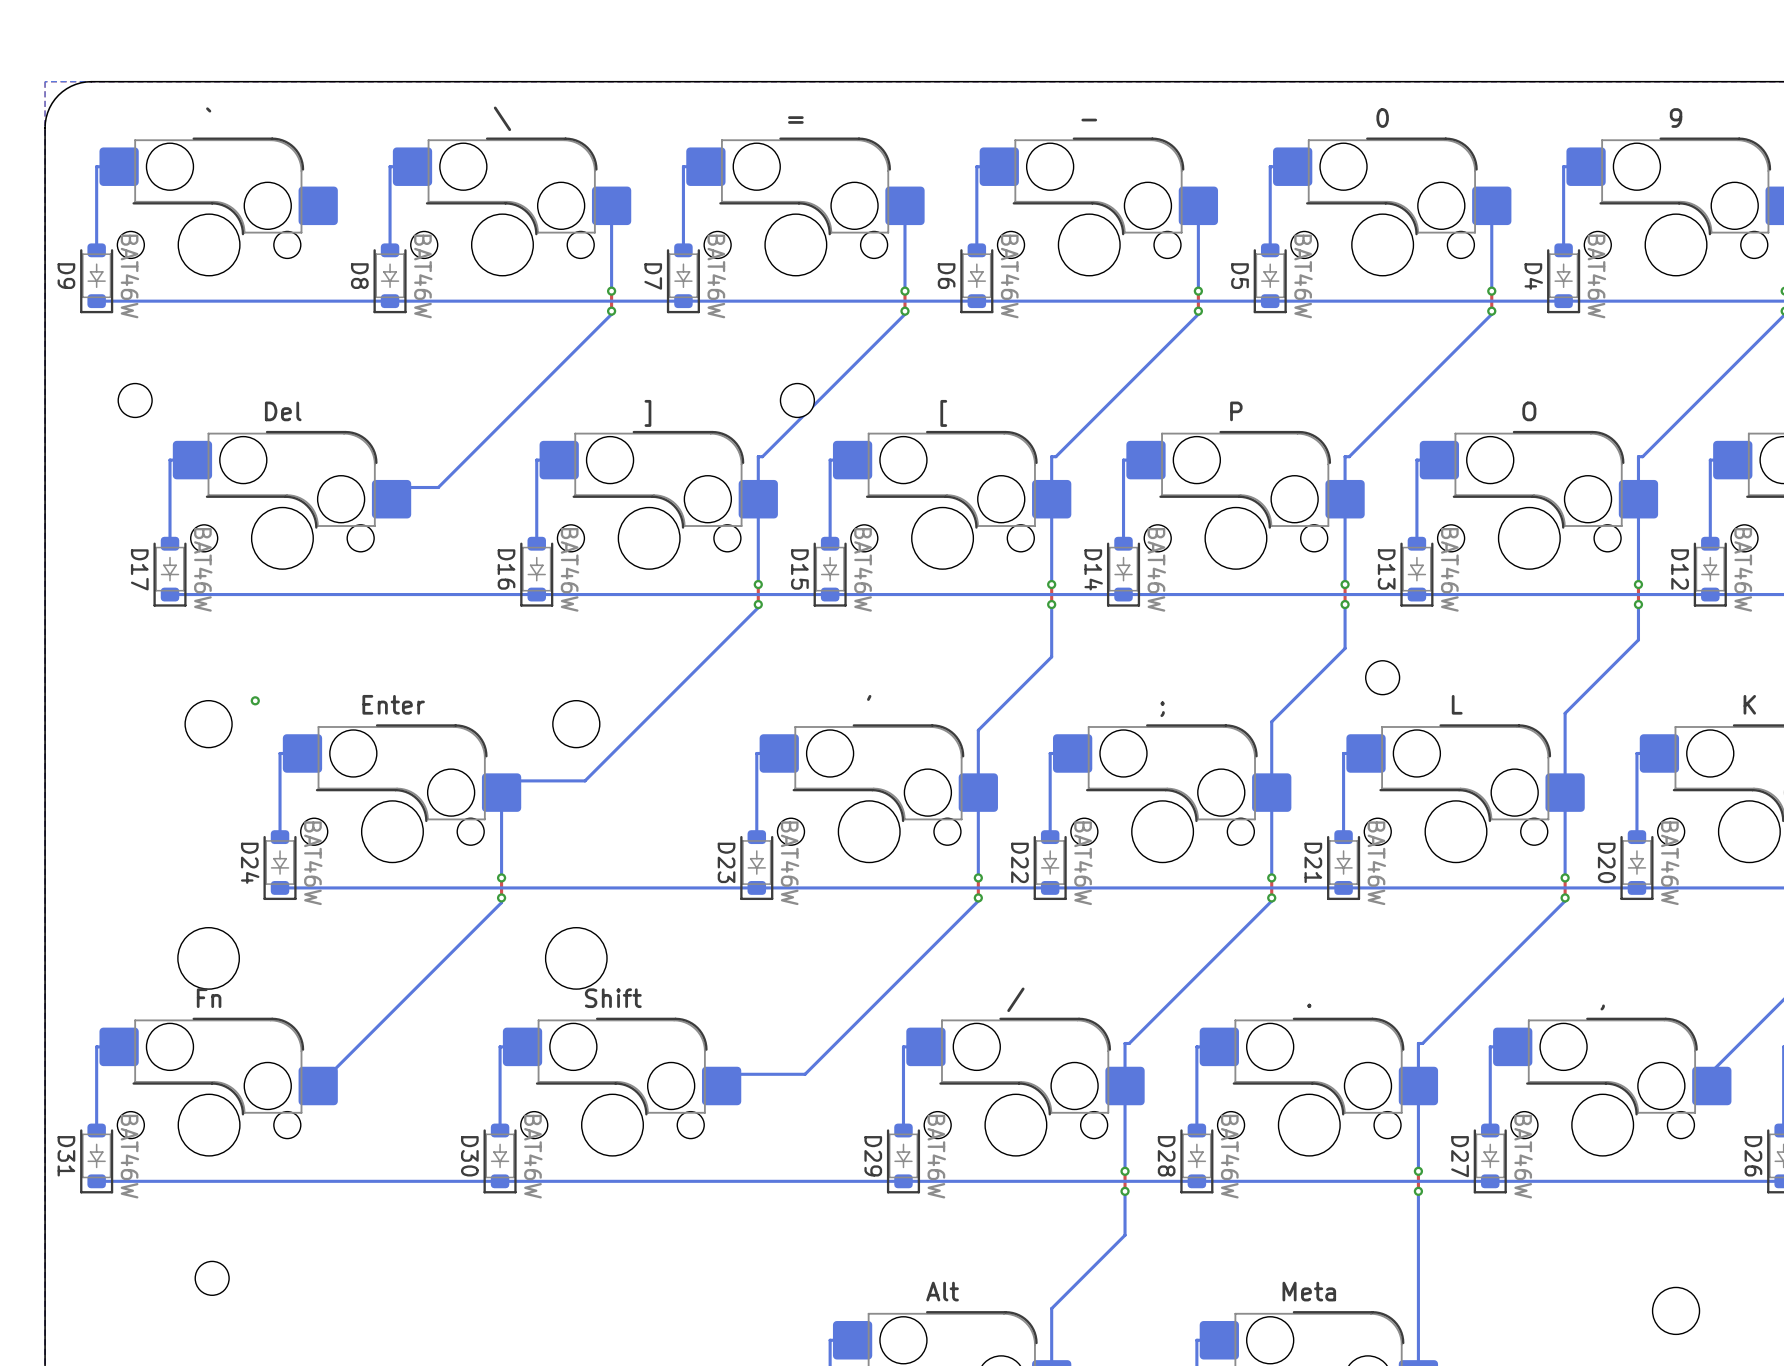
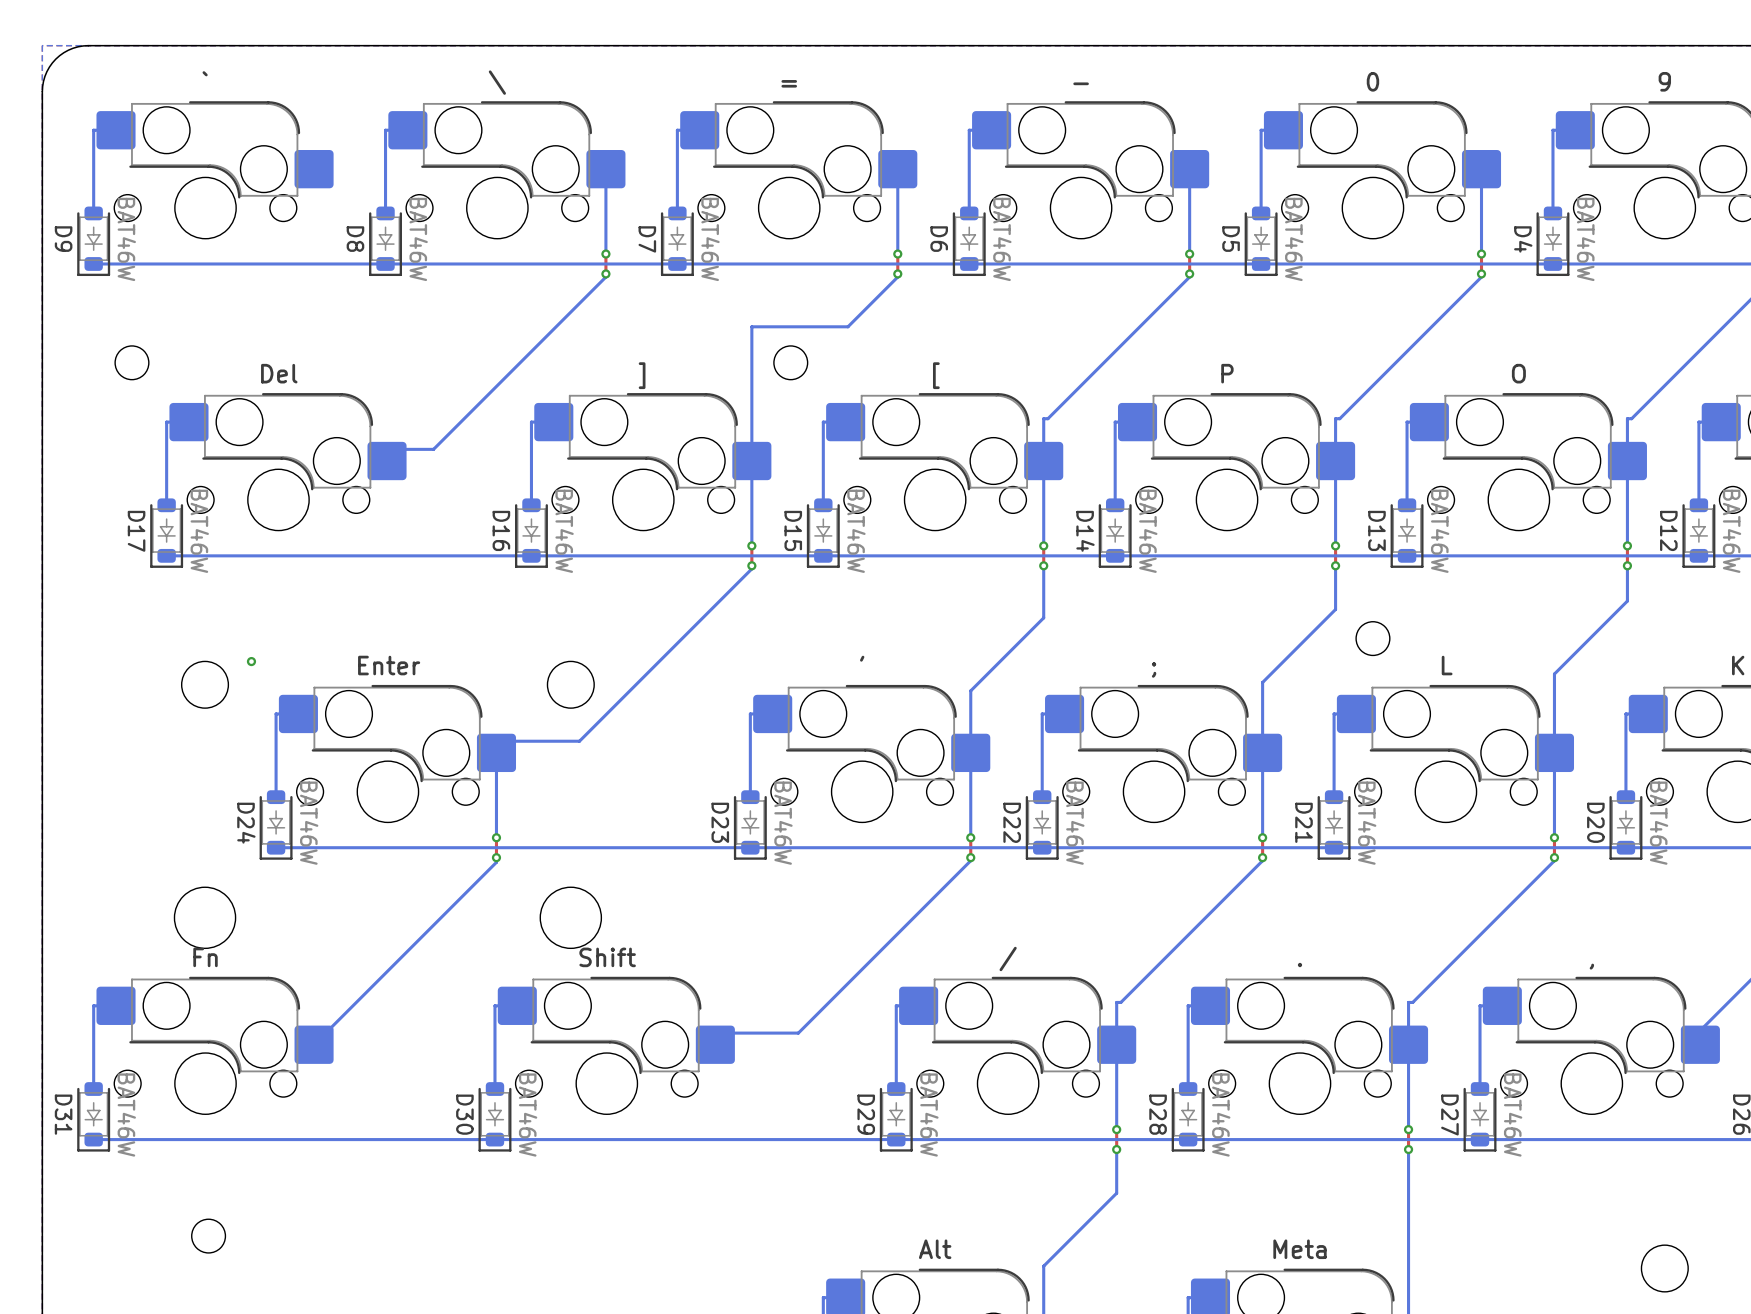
bottom track: (854, 364) (762, 456) (758, 456) -> (847, 326) (751, 326) (751, 418)

